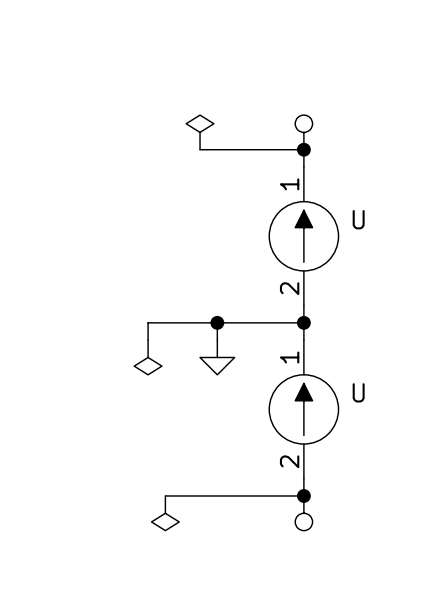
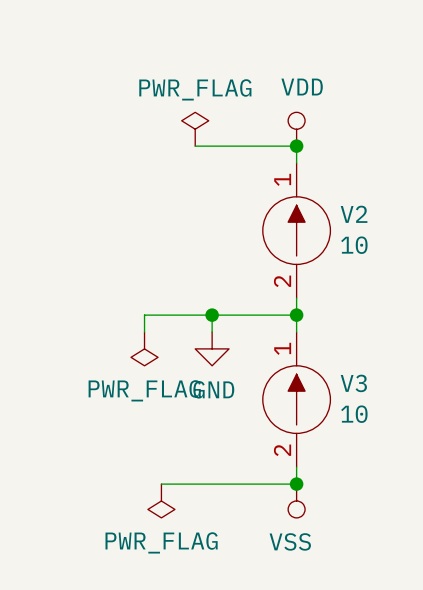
power symbol text: none -> VDD (302, 87)
power symbol text: none -> PWR_FLAG (195, 89)
U name: U (358, 219) -> V2 (354, 214)
U value: none -> 10 (354, 245)
U name: U (358, 392) -> V3 (353, 383)
power symbol text: none -> PWR_FLAG (144, 390)
power symbol text: none -> GND (213, 389)
U value: none -> 10 (354, 414)
power symbol text: none -> PWR_FLAG (161, 542)
power symbol text: none -> VSS (290, 541)

